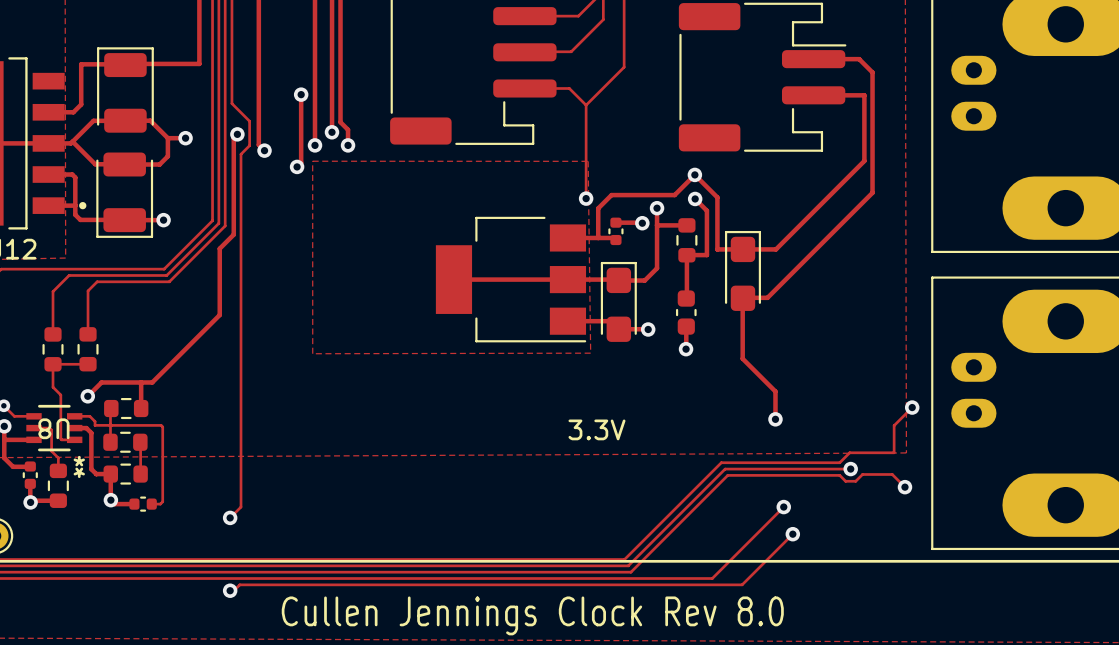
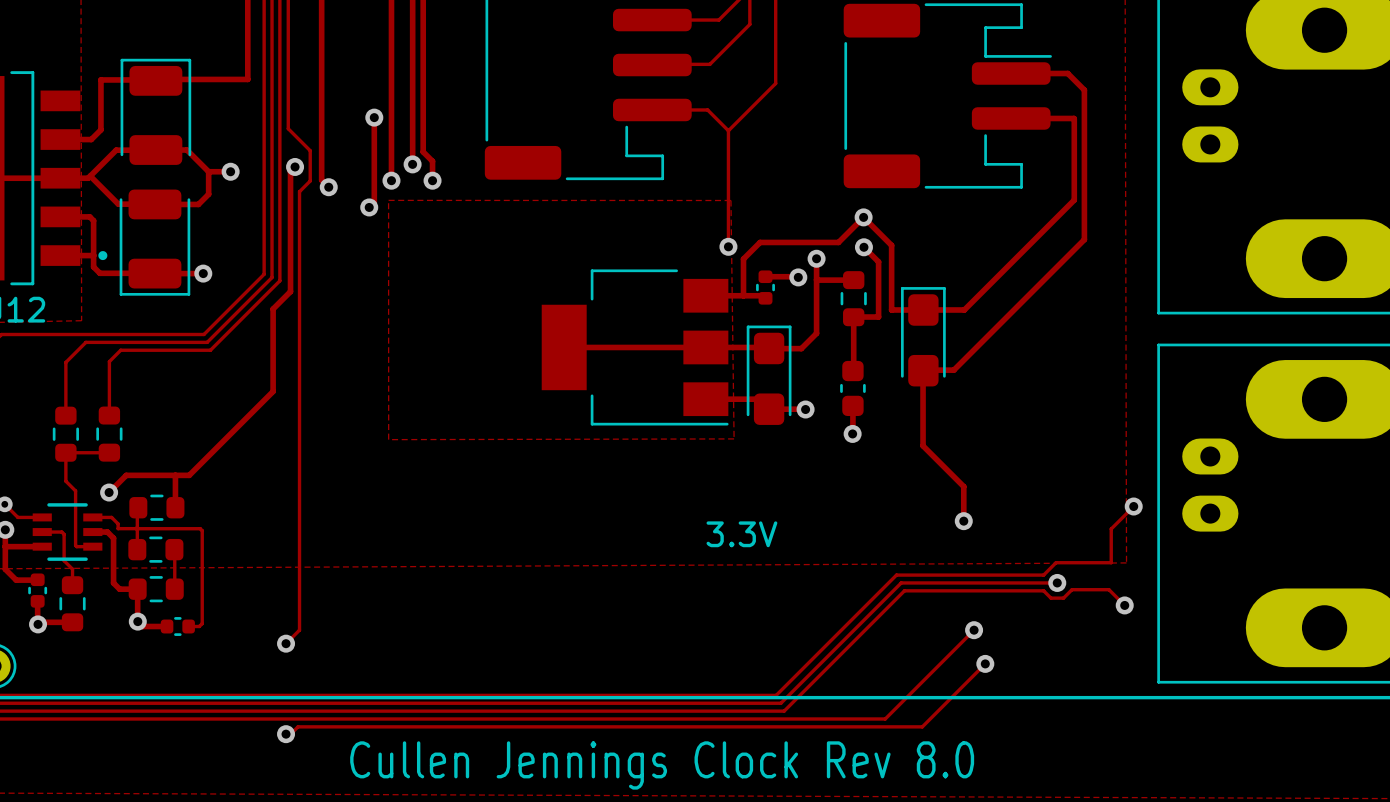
U8 footprint: [26, 404, 83, 452] -> [32, 503, 103, 561]
U8 name: U8 (53, 428) -> none

